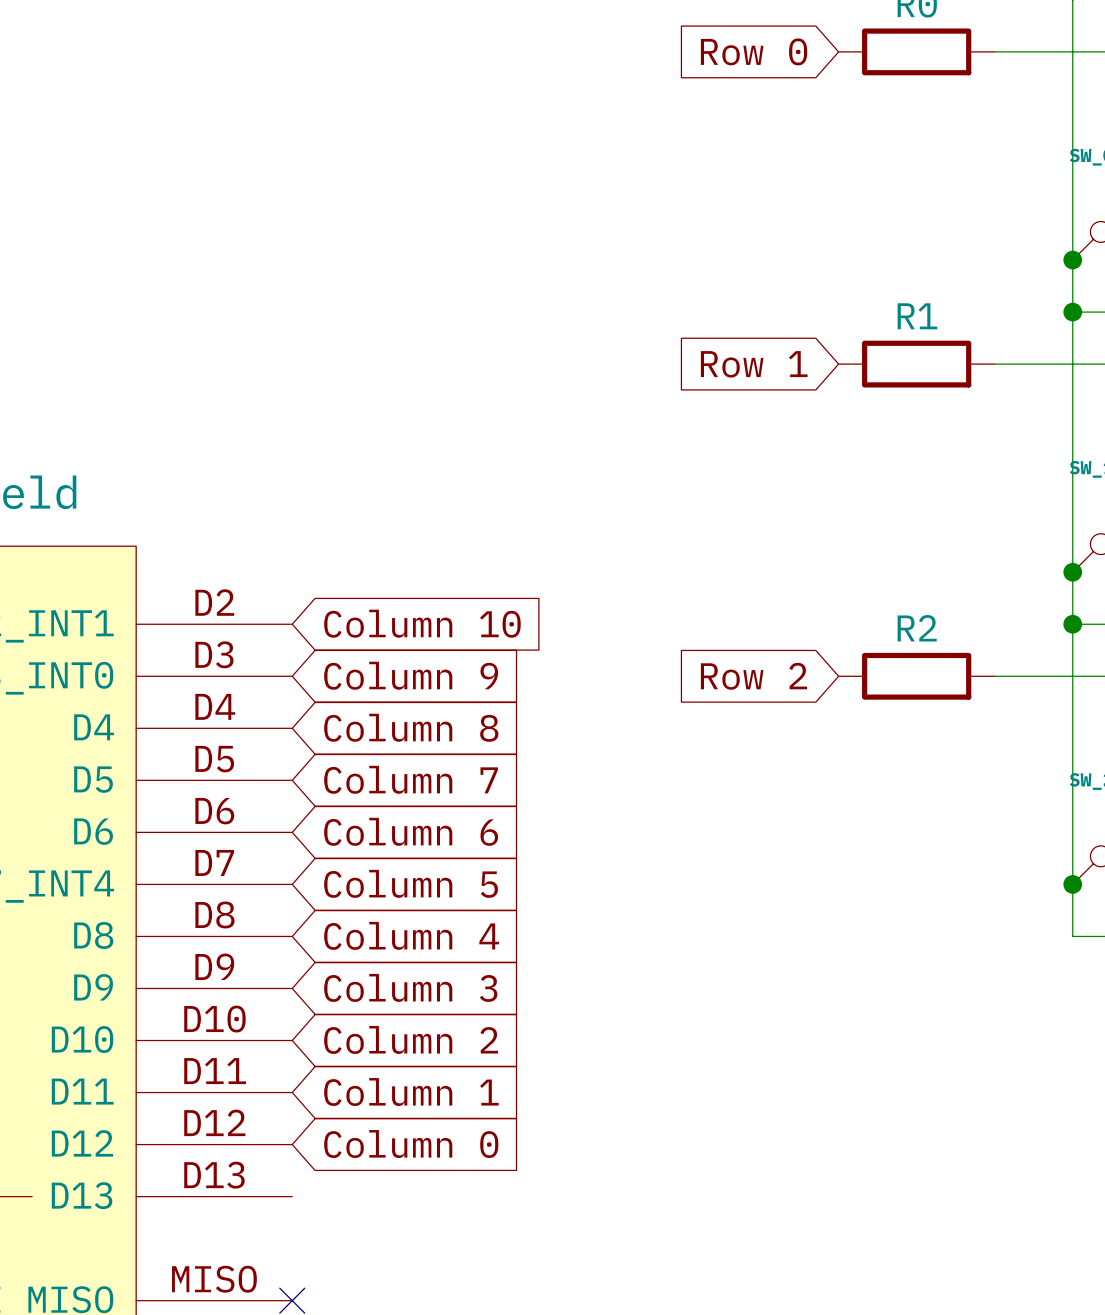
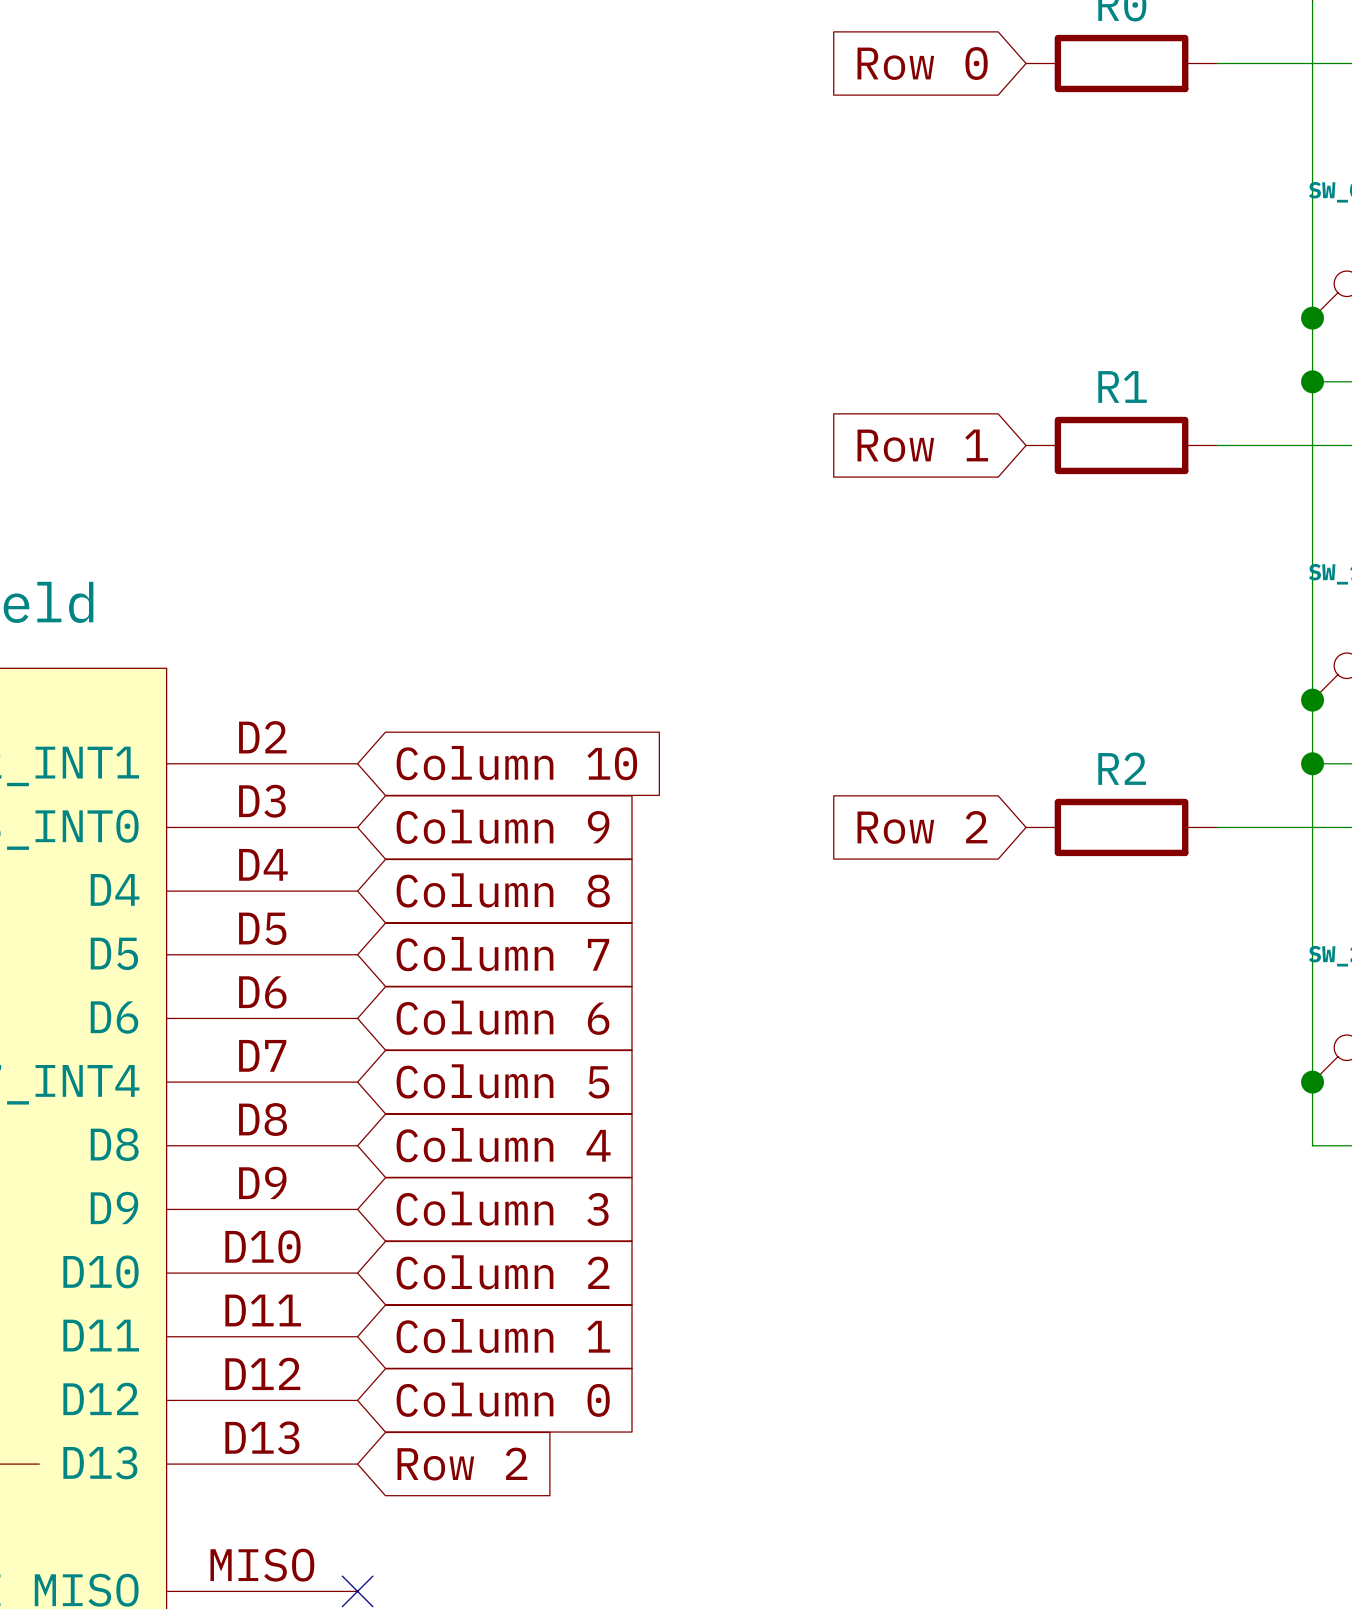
global label: none -> Row 2 (462, 1464)

